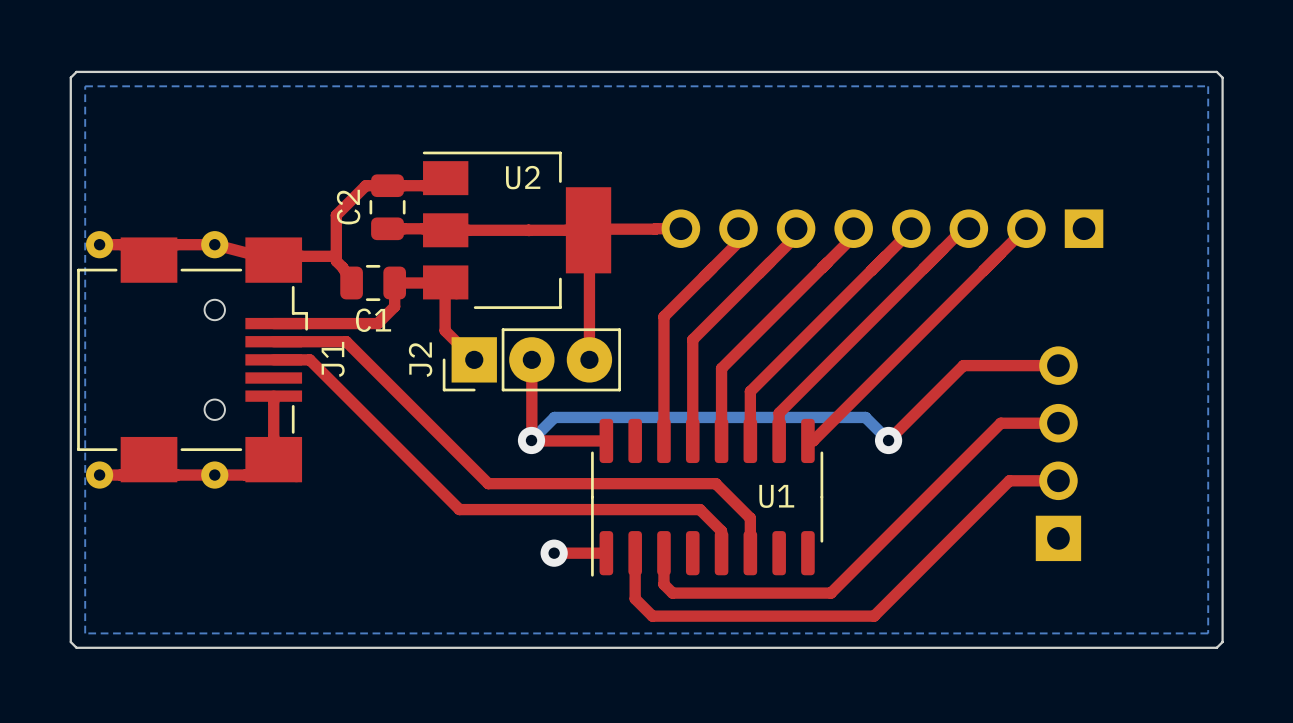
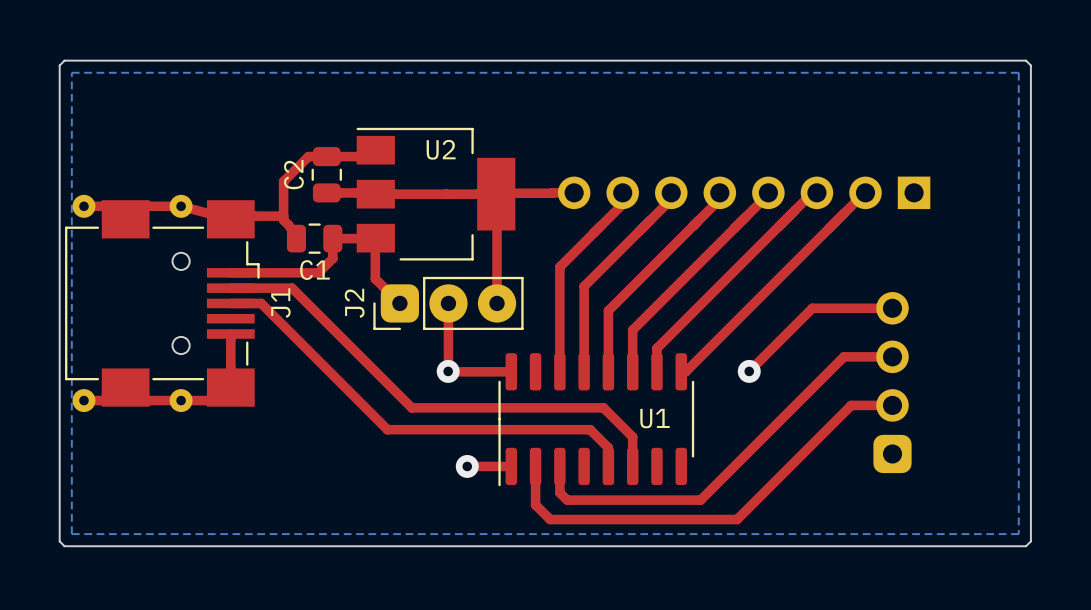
J2 footprint: [442, 328, 621, 392] -> [373, 276, 524, 331]
part footprint: [1035, 346, 1082, 562] -> [873, 292, 912, 474]
bottom track: (531, 440) (554, 417) (865, 417) (888, 440) -> none

